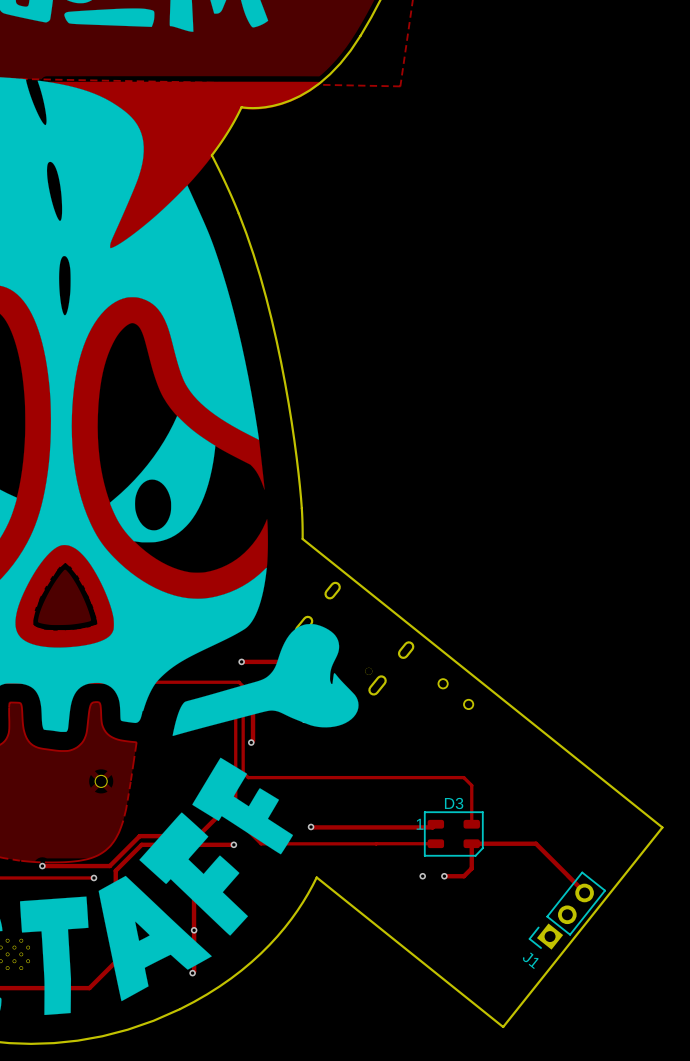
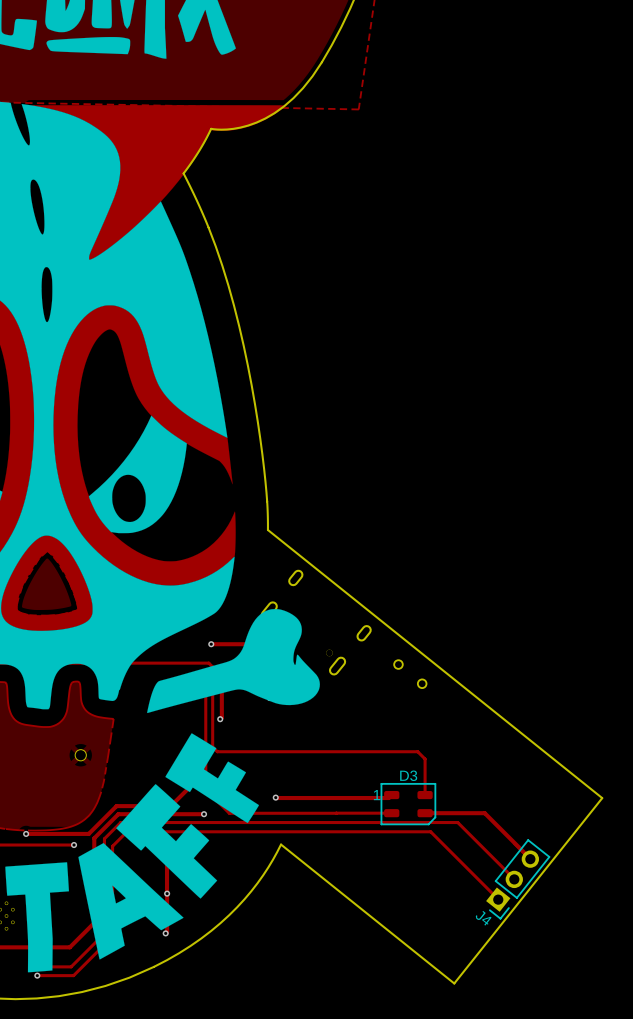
track: (471, 843) (471, 868) (463, 876) (444, 876) -> none
via: (422, 876) -> none
via: (444, 876) -> none
J1: (567, 910) -> none
track: none -> (514, 879) (457, 822) (120, 822) (104, 838) (104, 933) (71, 966) (40, 966) (37, 964)
J4: none -> (518, 879)
track: none -> (498, 899) (430, 831) (127, 831) (112, 846) (112, 936) (73, 975) (37, 975)
via: none -> (37, 975)

